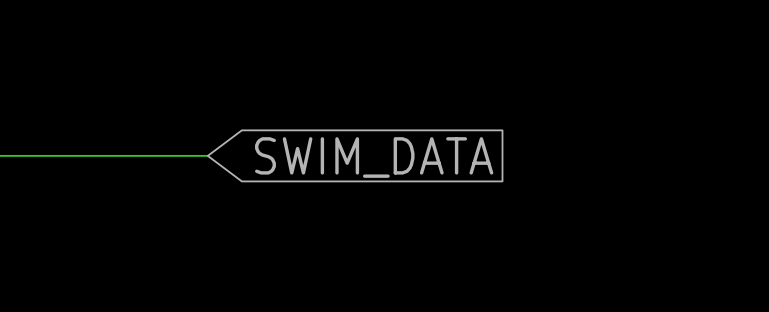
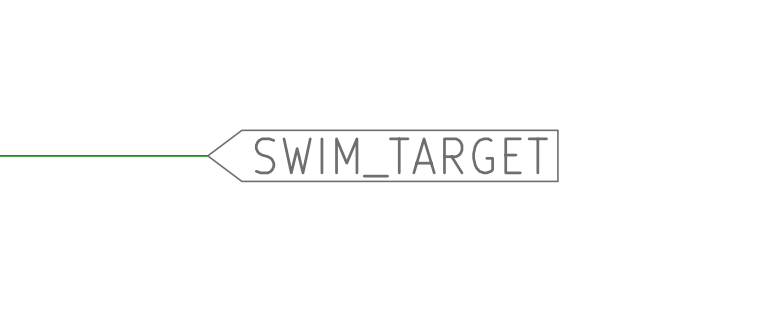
global label: SWIM_DATA (374, 157) -> SWIM_TARGET (401, 157)

